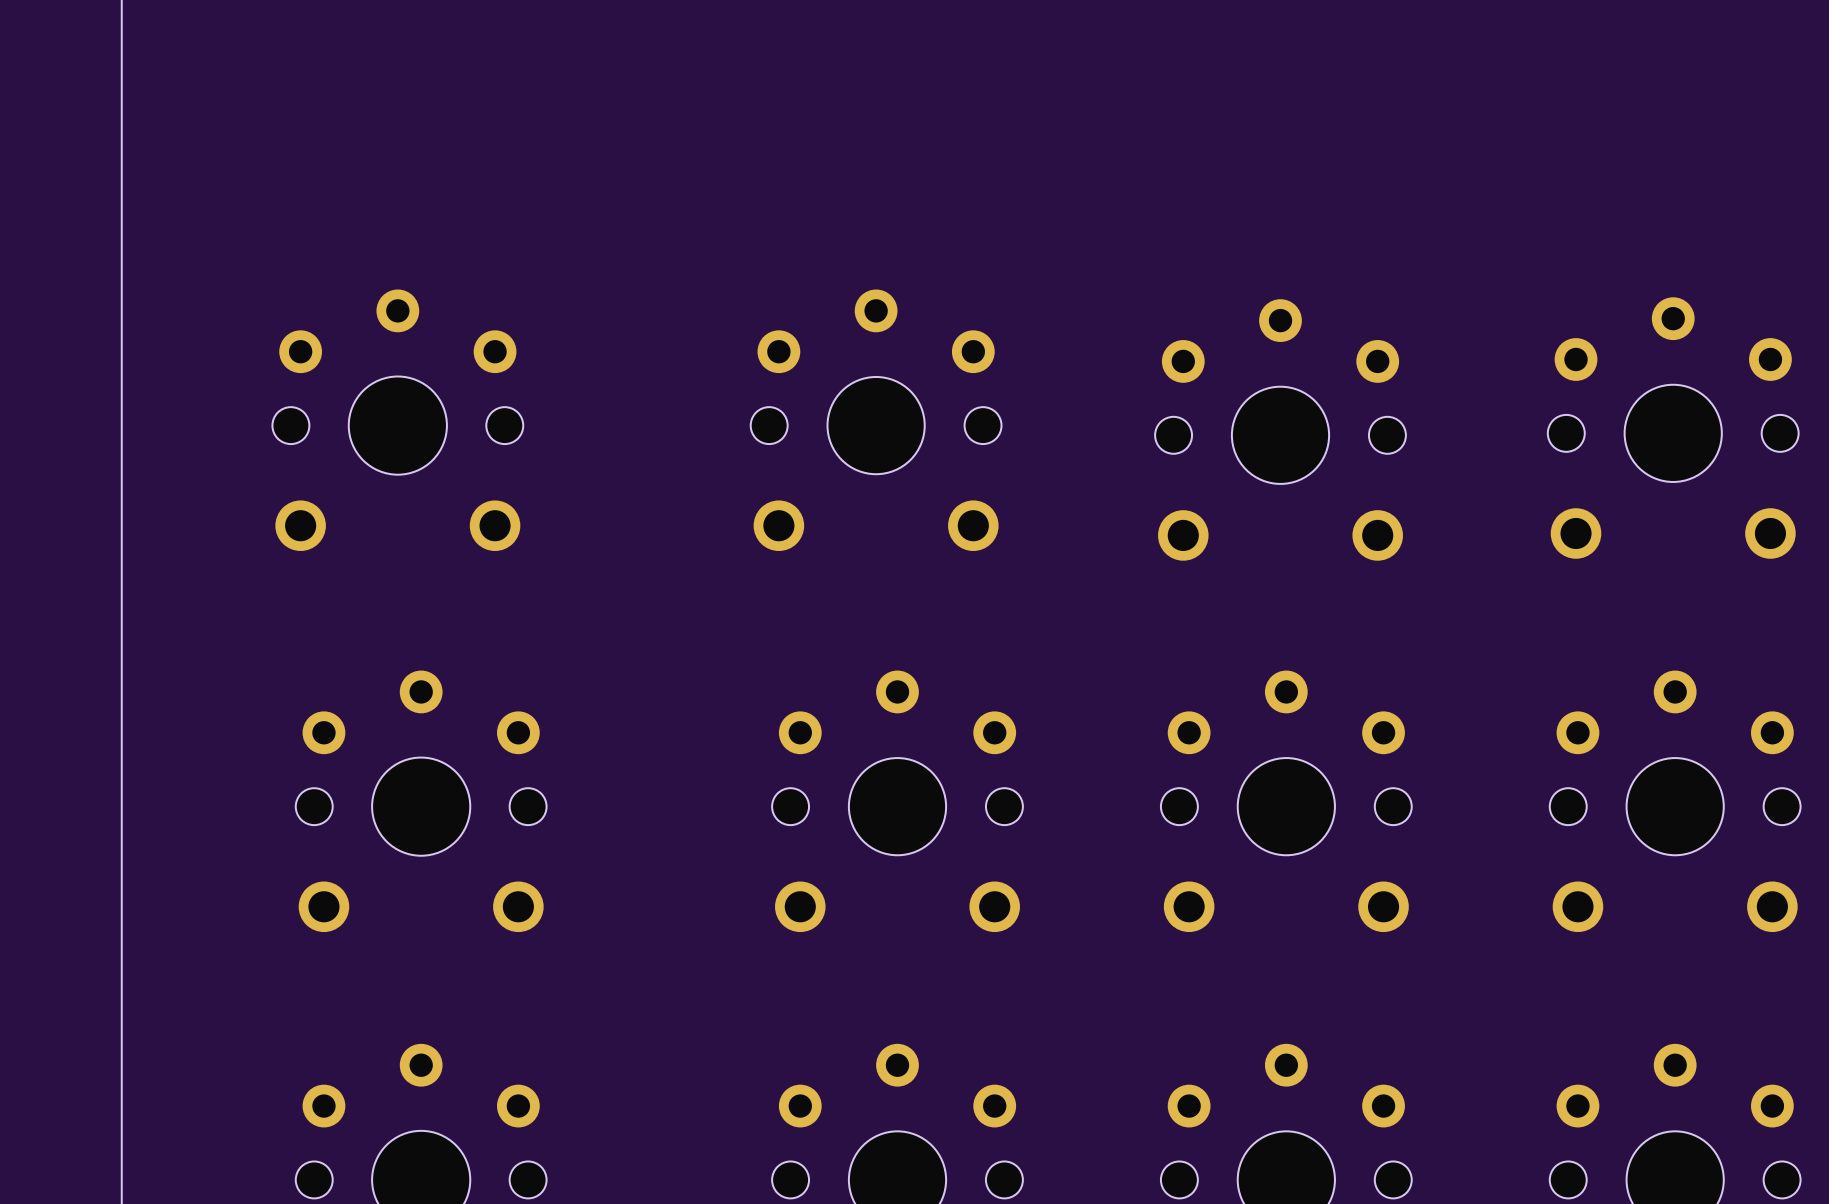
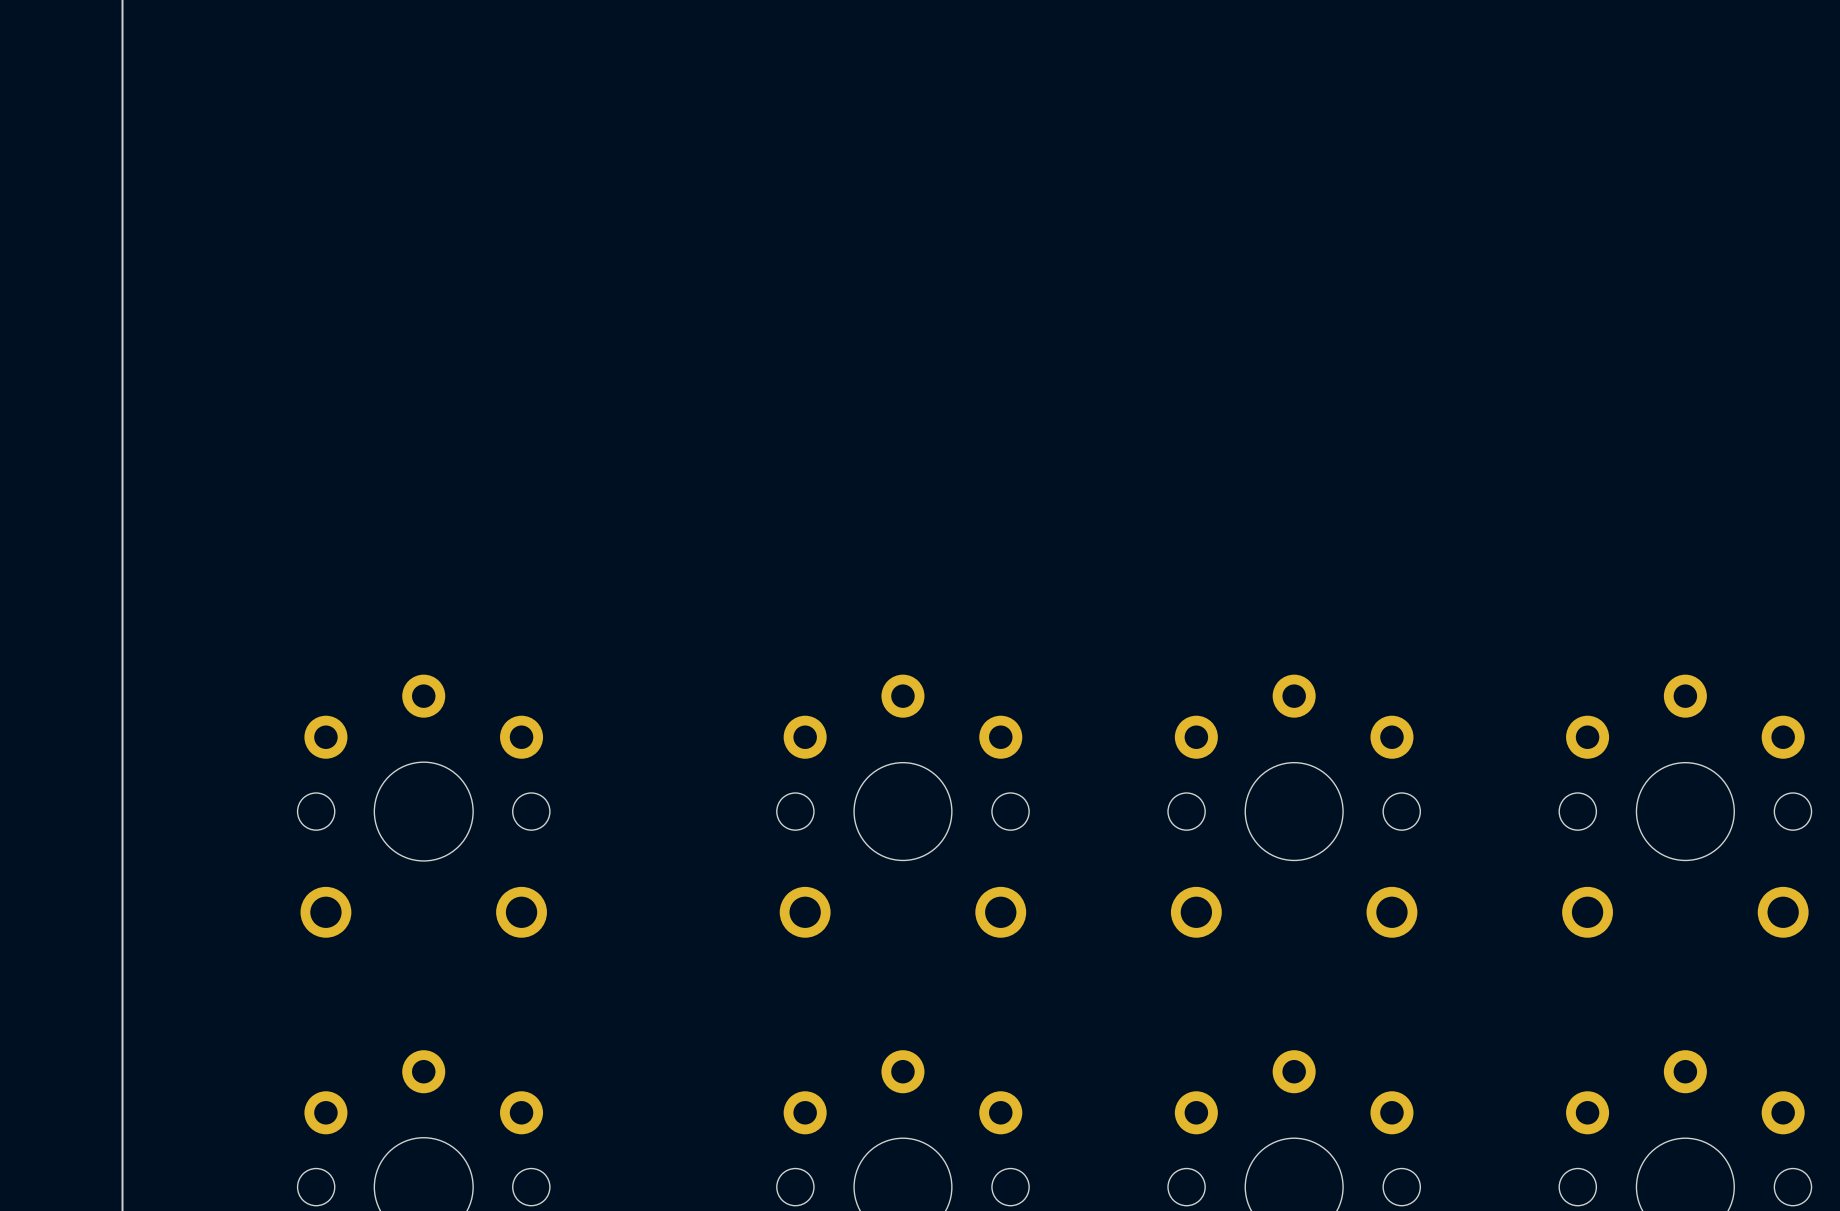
part: (397, 420) -> none
part: (876, 420) -> none
part: (1673, 428) -> none
part: (1280, 429) -> none

